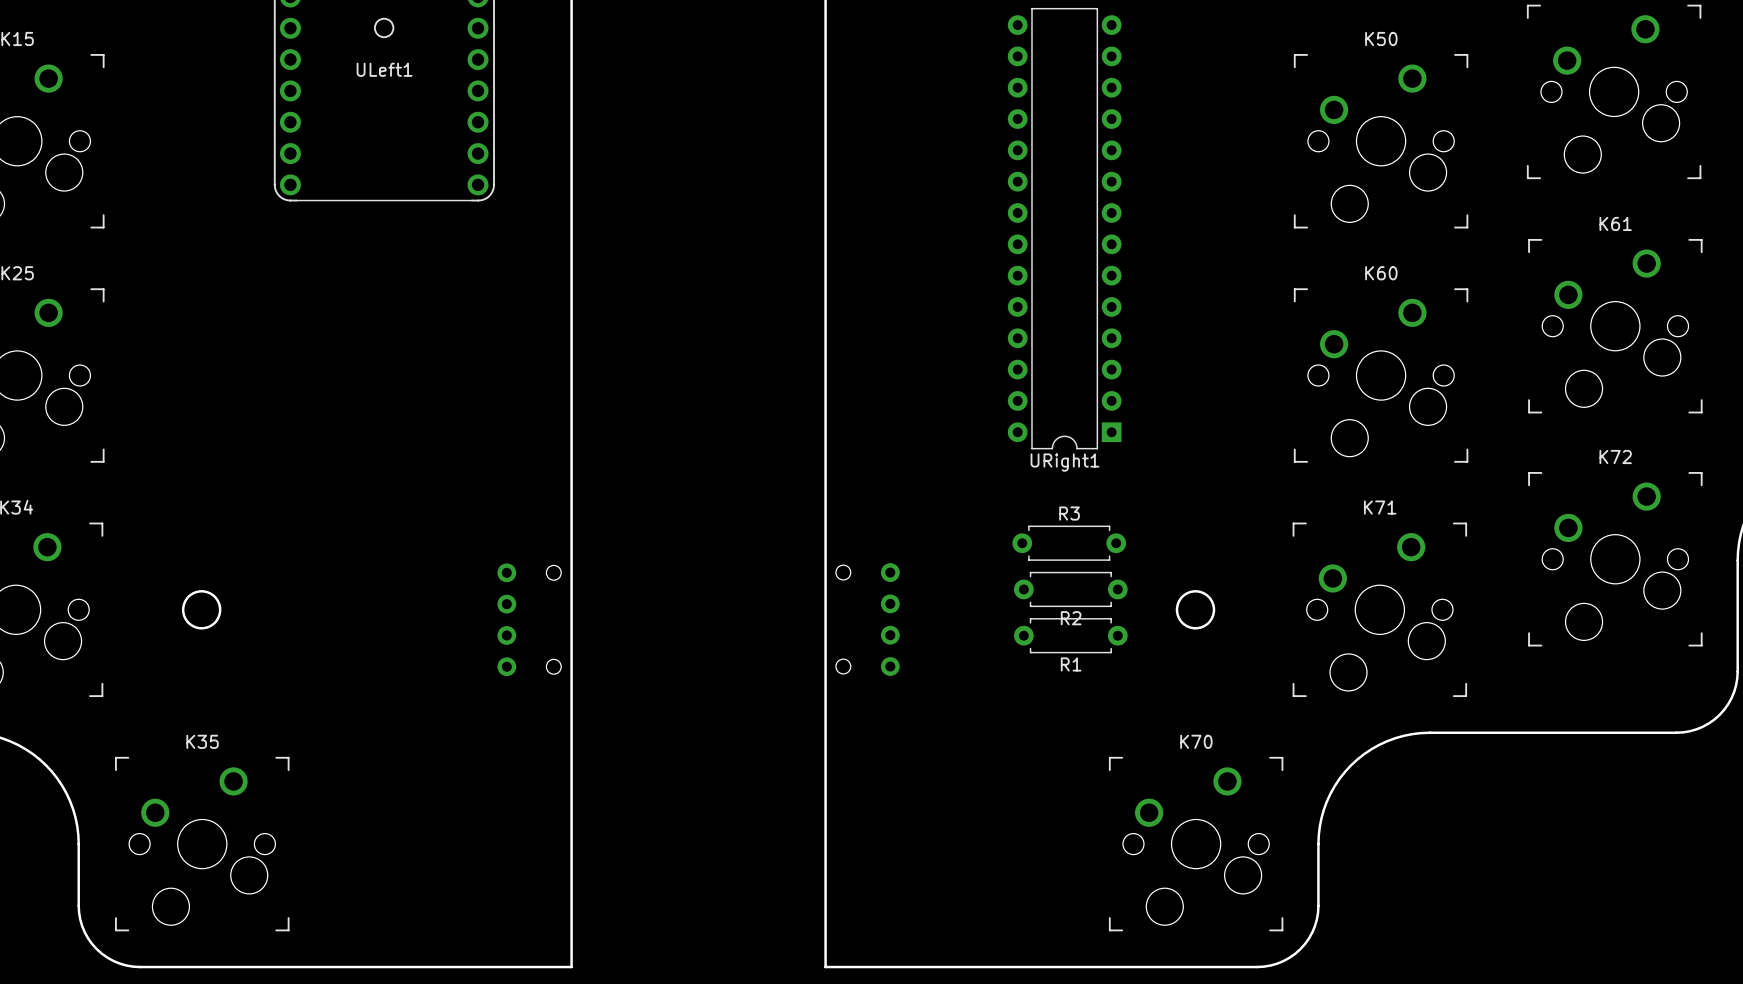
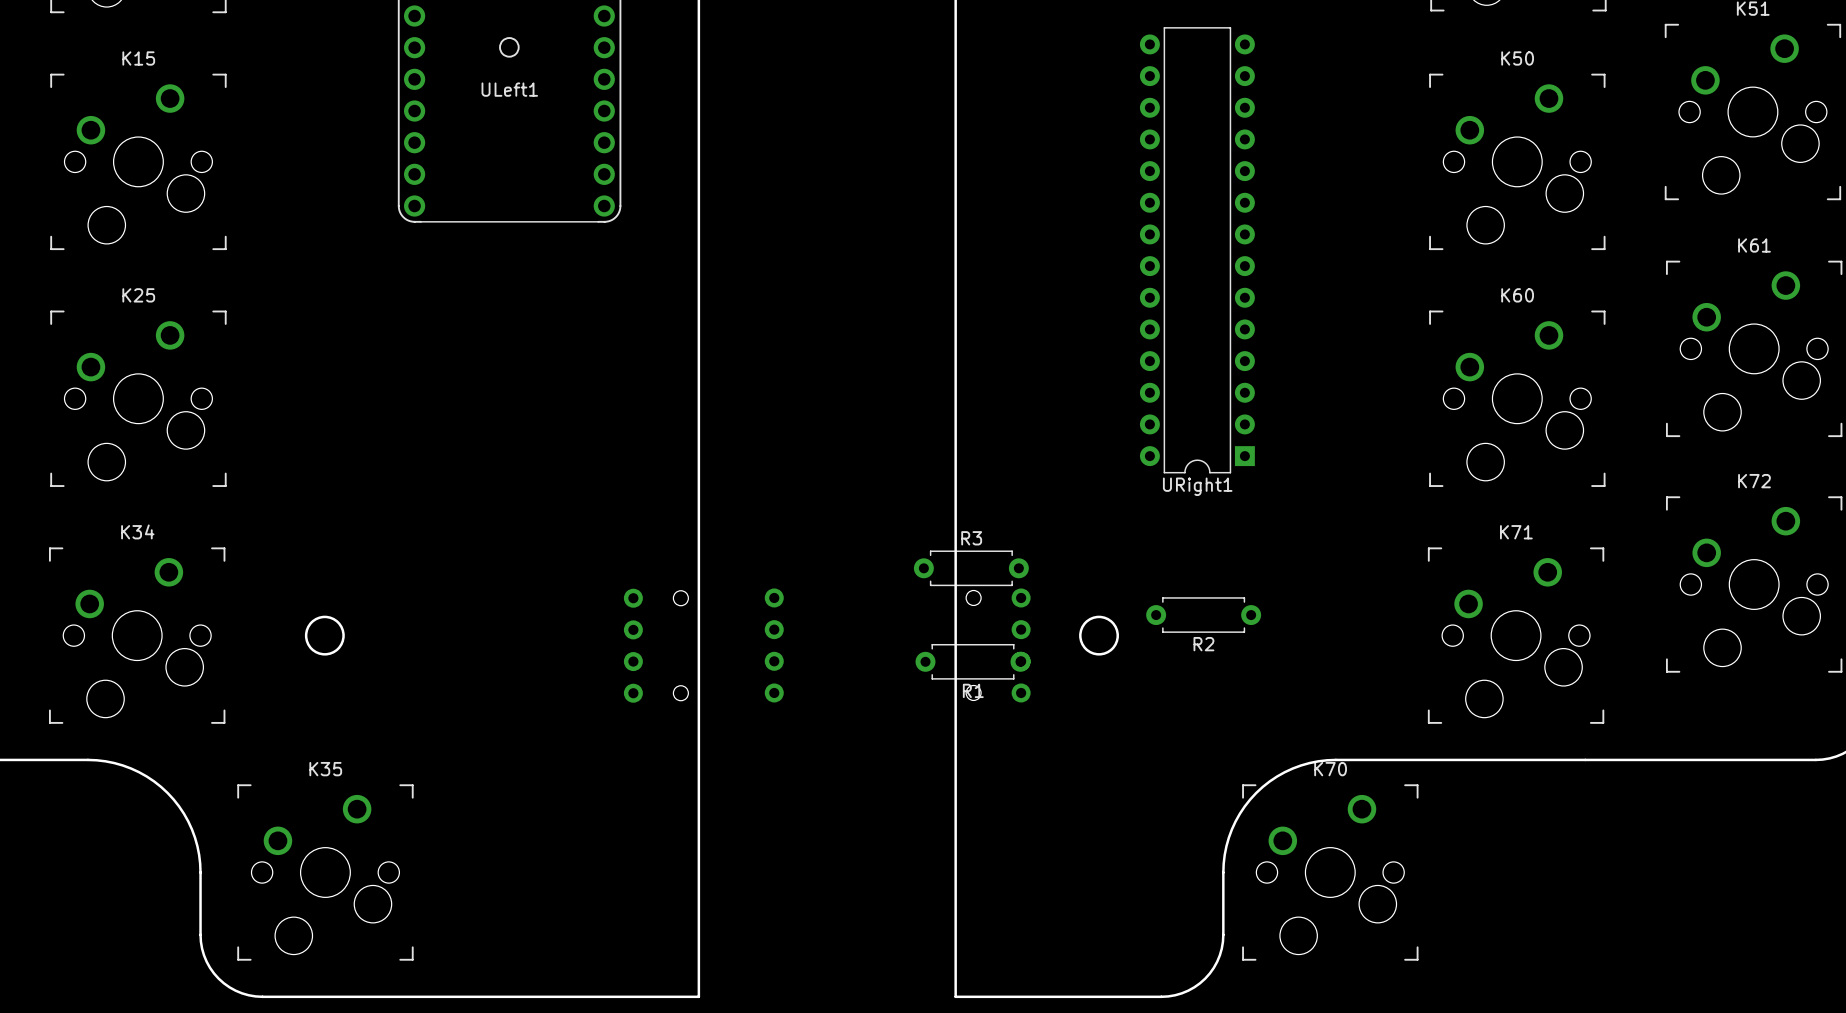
R3 position: (1069, 543) -> (971, 568)
round board edge position: (1195, 609) -> (1099, 635)
part: none -> (774, 645)
R1 position: (1070, 635) -> (973, 661)
board edge: (1429, 732) (1403, 735) (1371, 749) (1351, 765) (1334, 785) (1326, 801) (1319, 826) (1316, 919) (1312, 932) (1305, 943) (1289, 957) (1270, 965) (1257, 967) (1029, 967) -> (1566, 759) (1327, 760) (1301, 765) (1277, 776) (1250, 799) (1239, 813) (1228, 837) (1223, 863) (1222, 941) (1217, 961) (1209, 973) (1194, 987) (1175, 995) (1161, 996)

